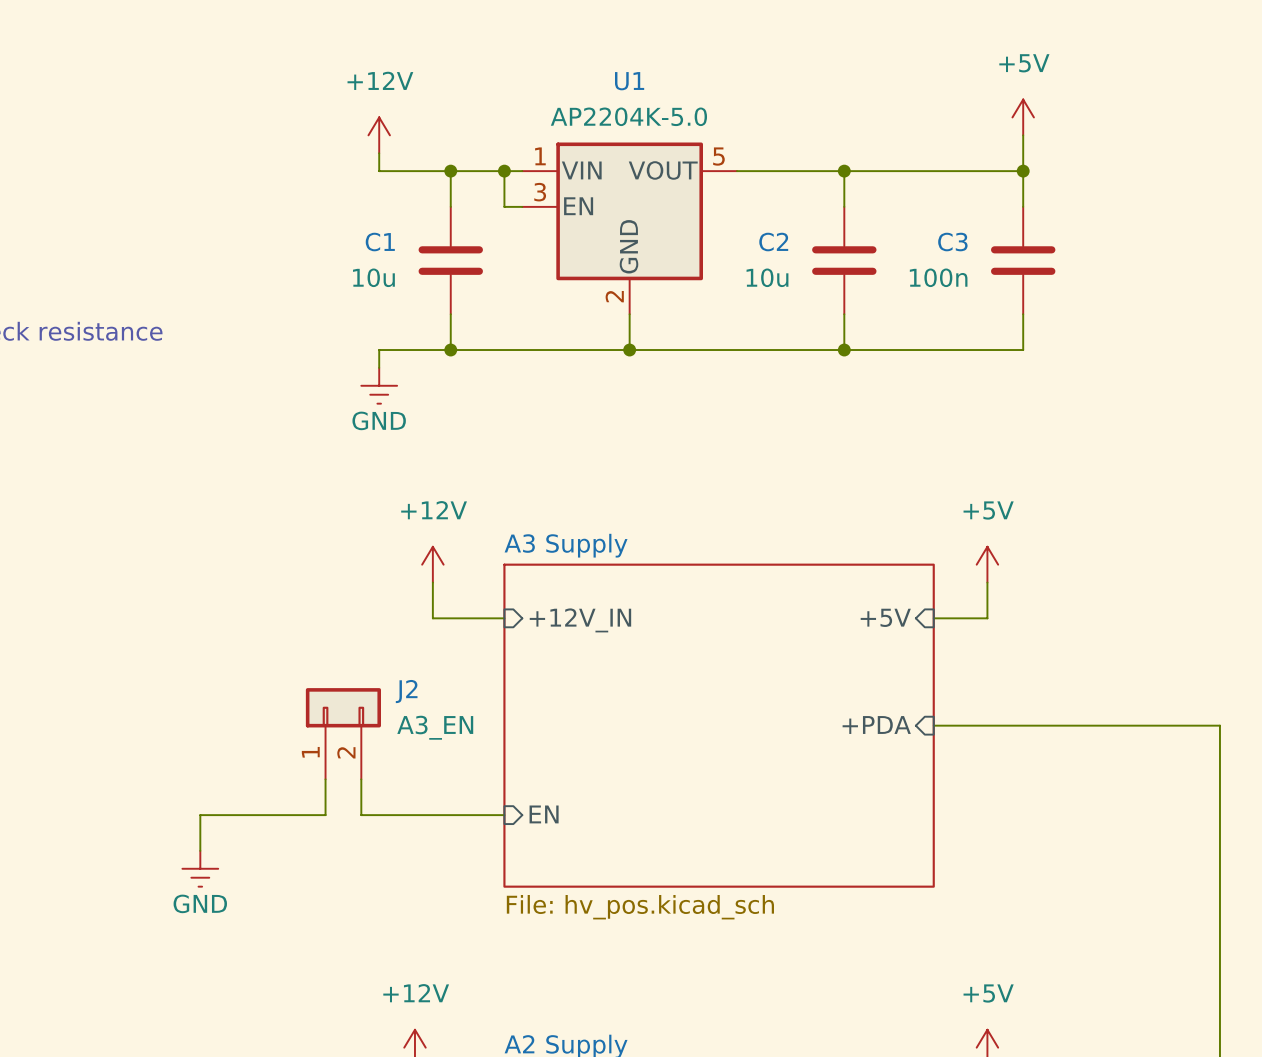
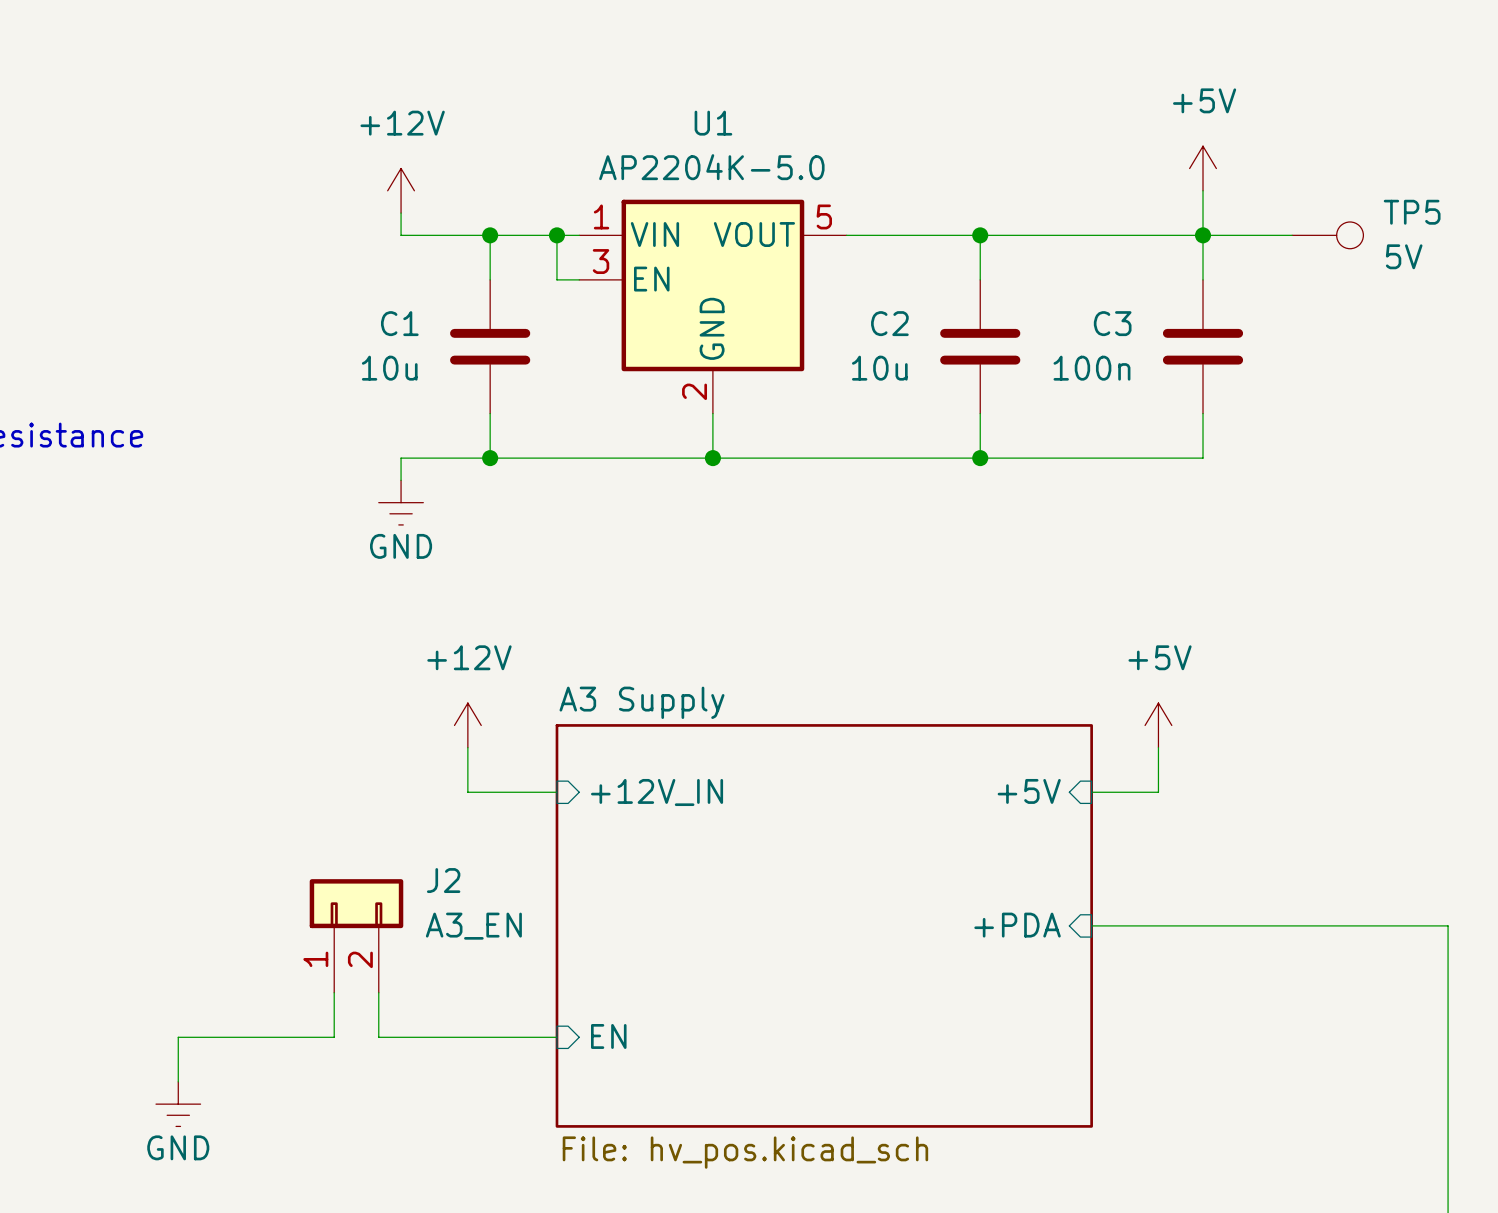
wire: none -> (1203, 235) (1292, 235)
TP5: none -> 5V (1327, 235)

